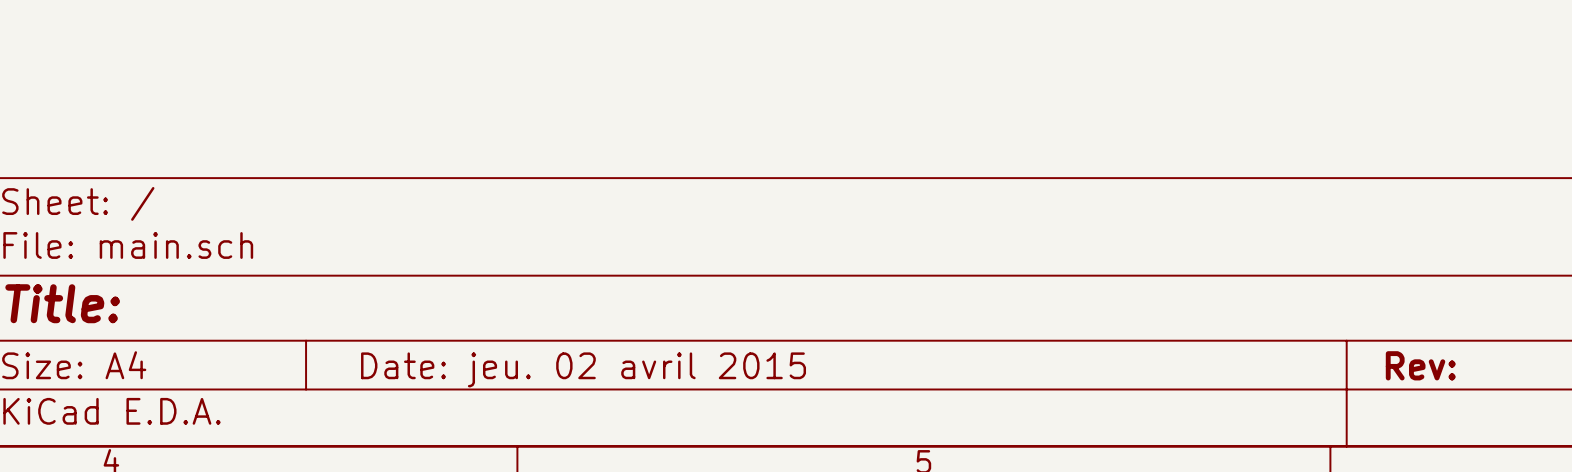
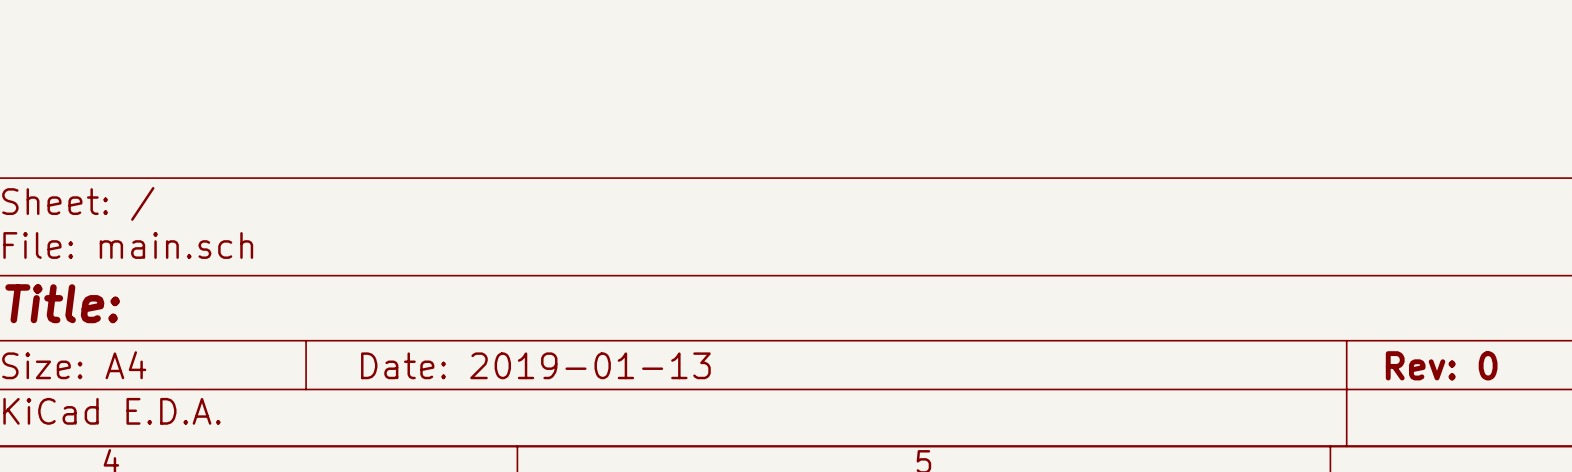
title block: Rev: (1420, 365) -> Rev: 0 (1441, 365)
title block: Date: jeu. 02 avril 2015 (583, 369) -> Date: 2019-01-13 (535, 365)

